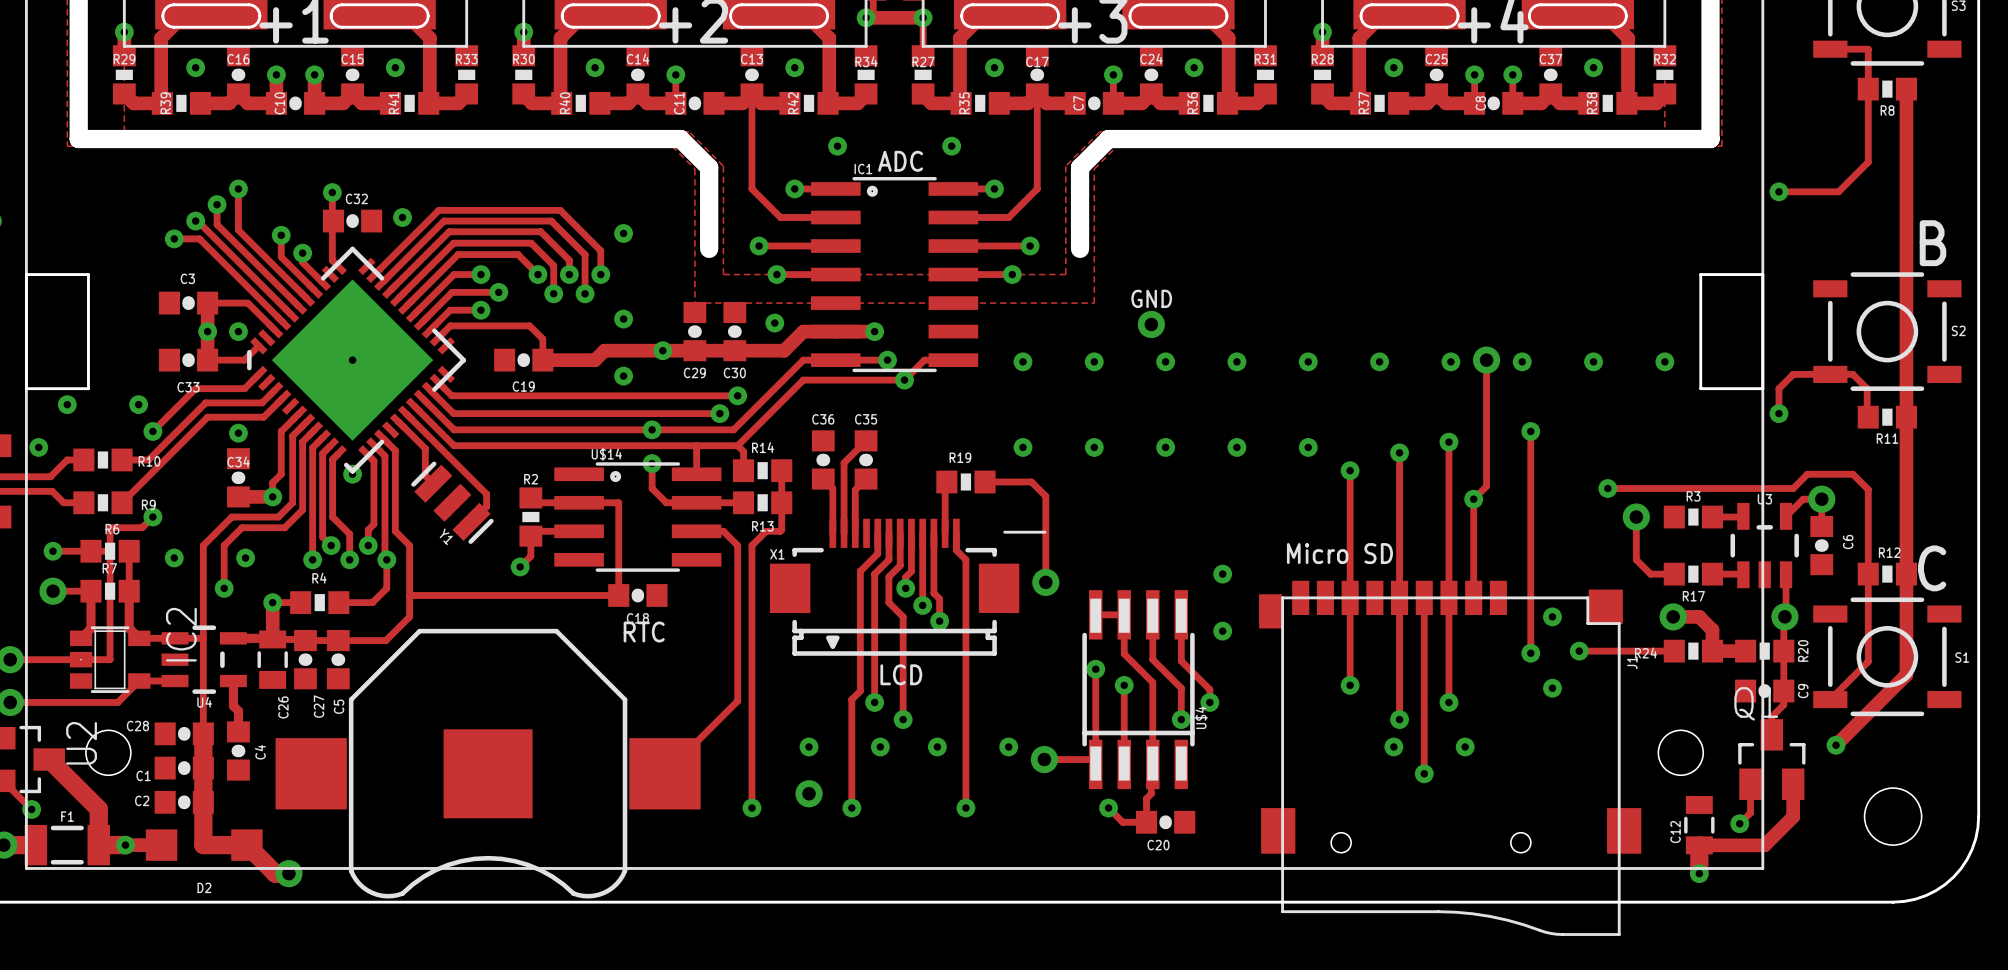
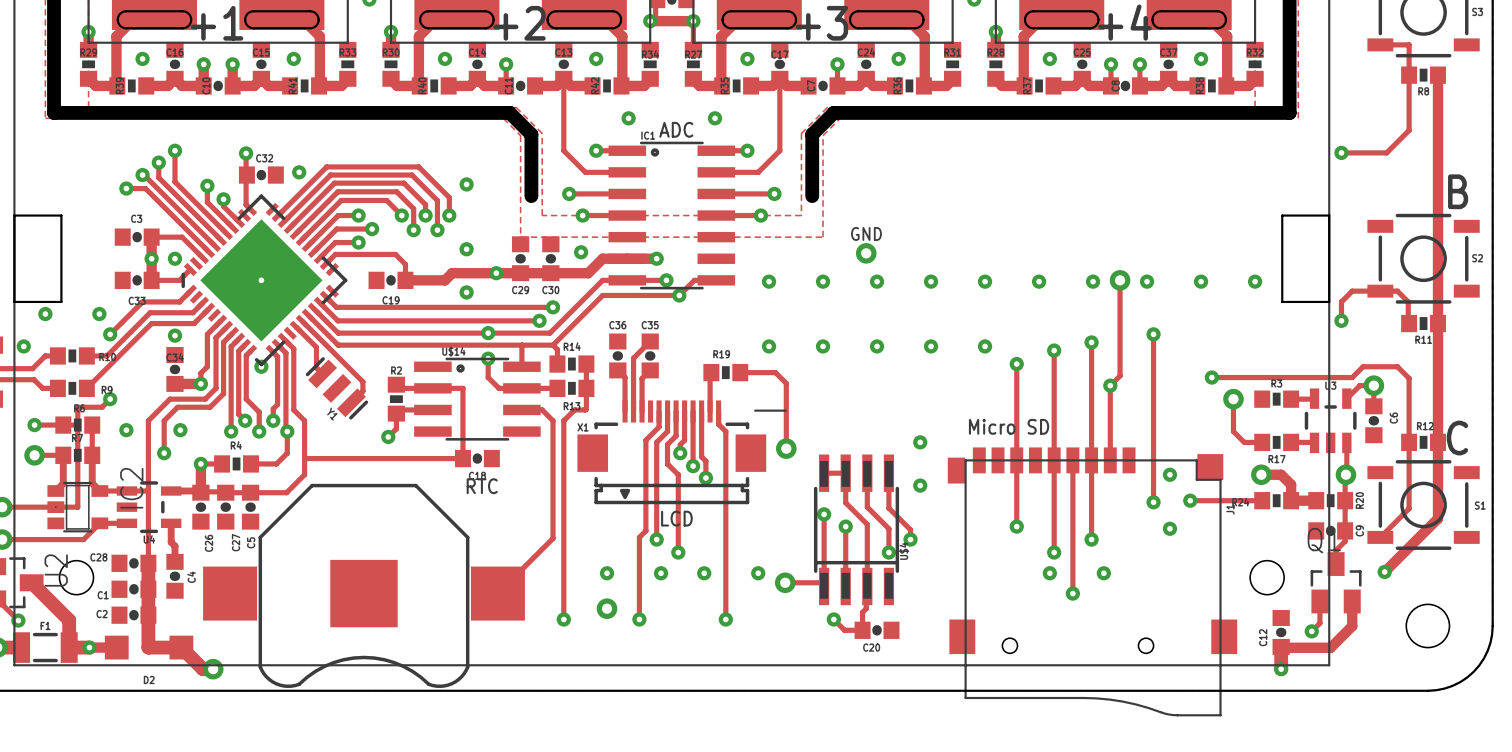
C26 footprint: [257, 630, 288, 689] -> [192, 484, 210, 530]
C12 footprint: [1684, 795, 1715, 855] -> [1272, 610, 1290, 655]

